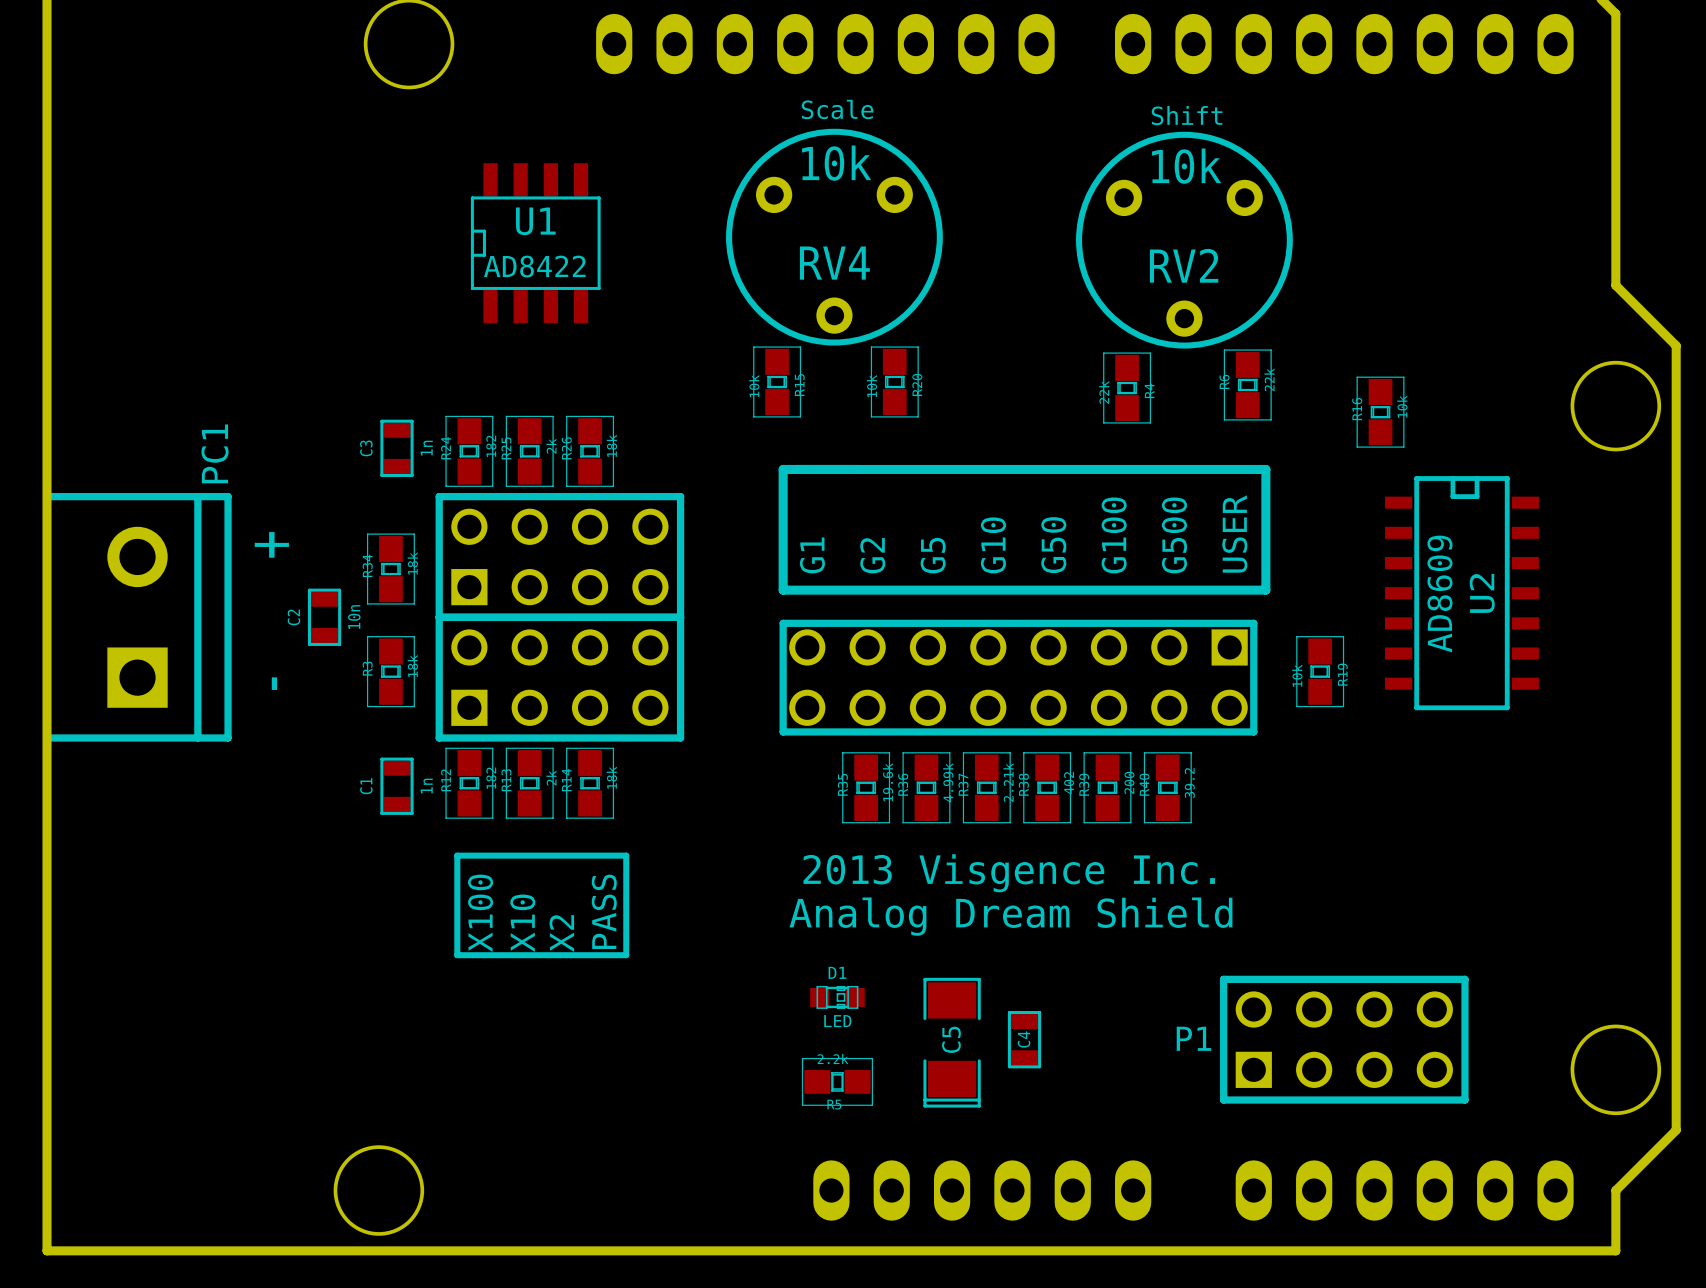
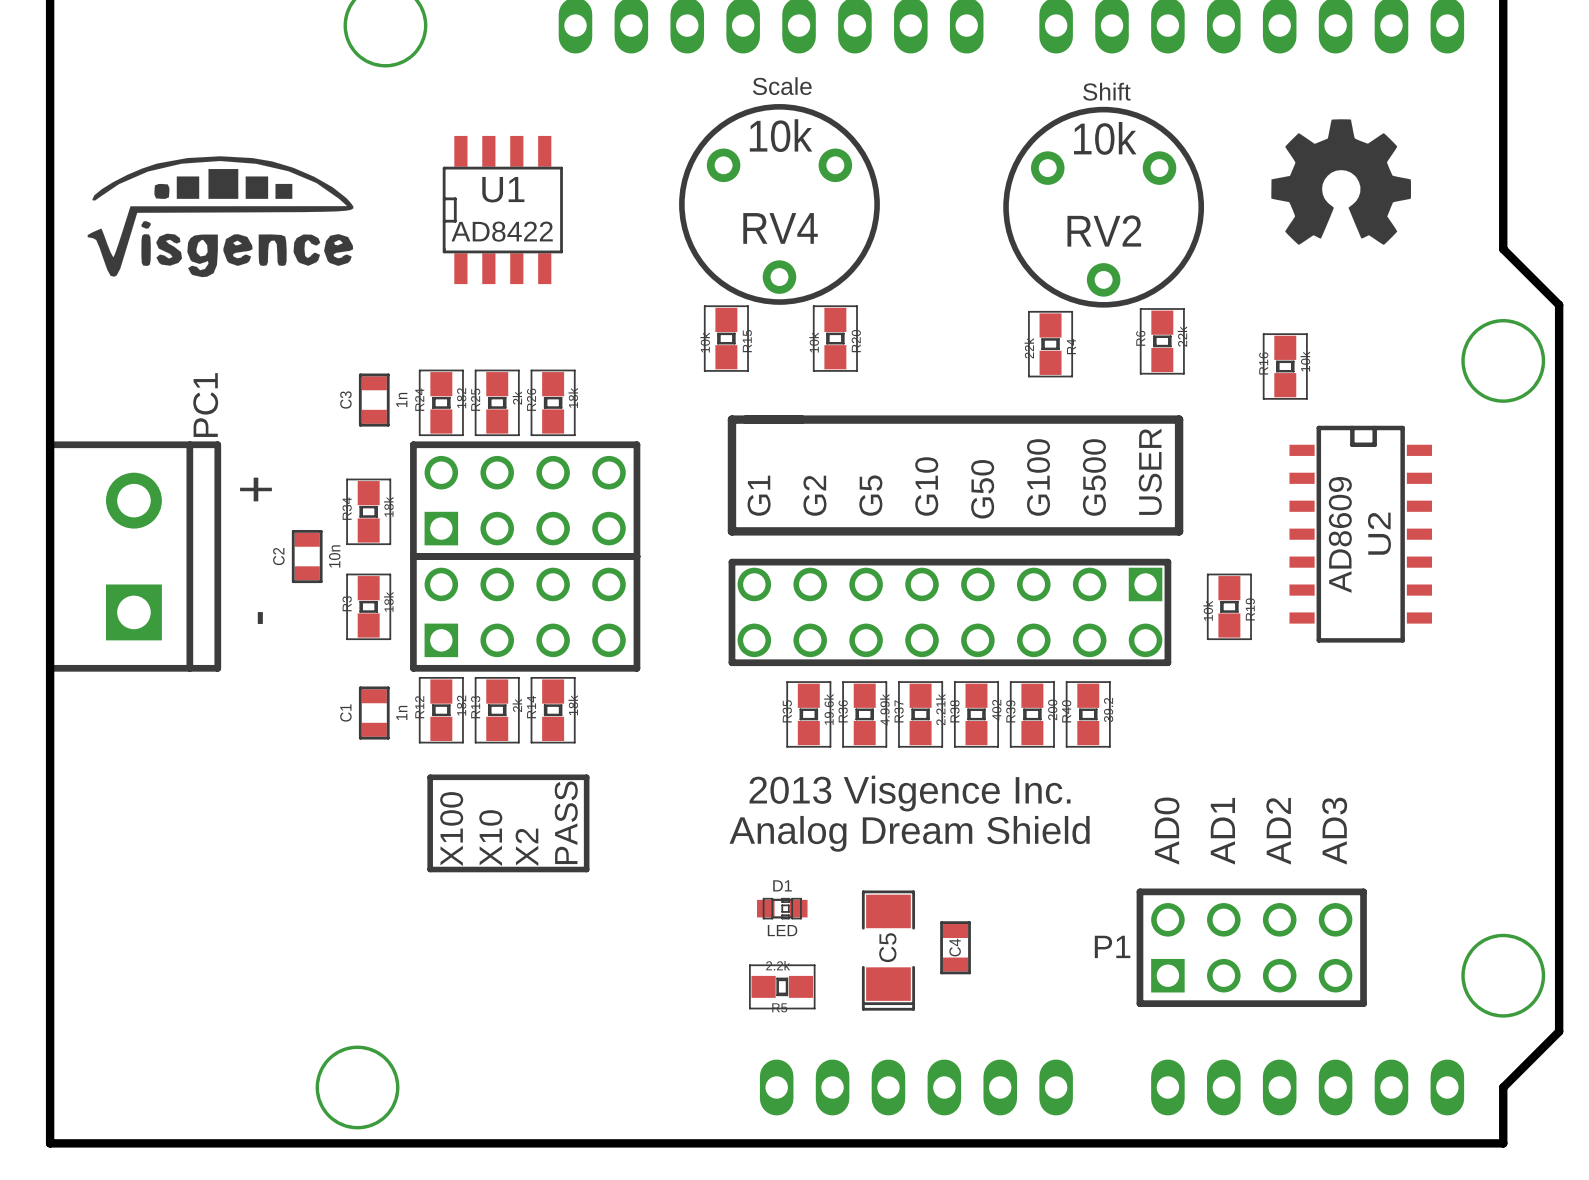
drawing: none -> [1271, 119, 1412, 245]
drawing: none -> [87, 156, 354, 278]
text position: 2013 Visgence Inc. (1009, 873) -> 2013 Visgence Inc. (910, 793)
text: none -> AD0 (1167, 831)
text: none -> AD1 (1222, 831)
text: none -> AD3 (1334, 831)
text: none -> AD2 (1278, 831)
text position: Analog Dream Shield (1010, 916) -> Analog Dream Shield (909, 833)

